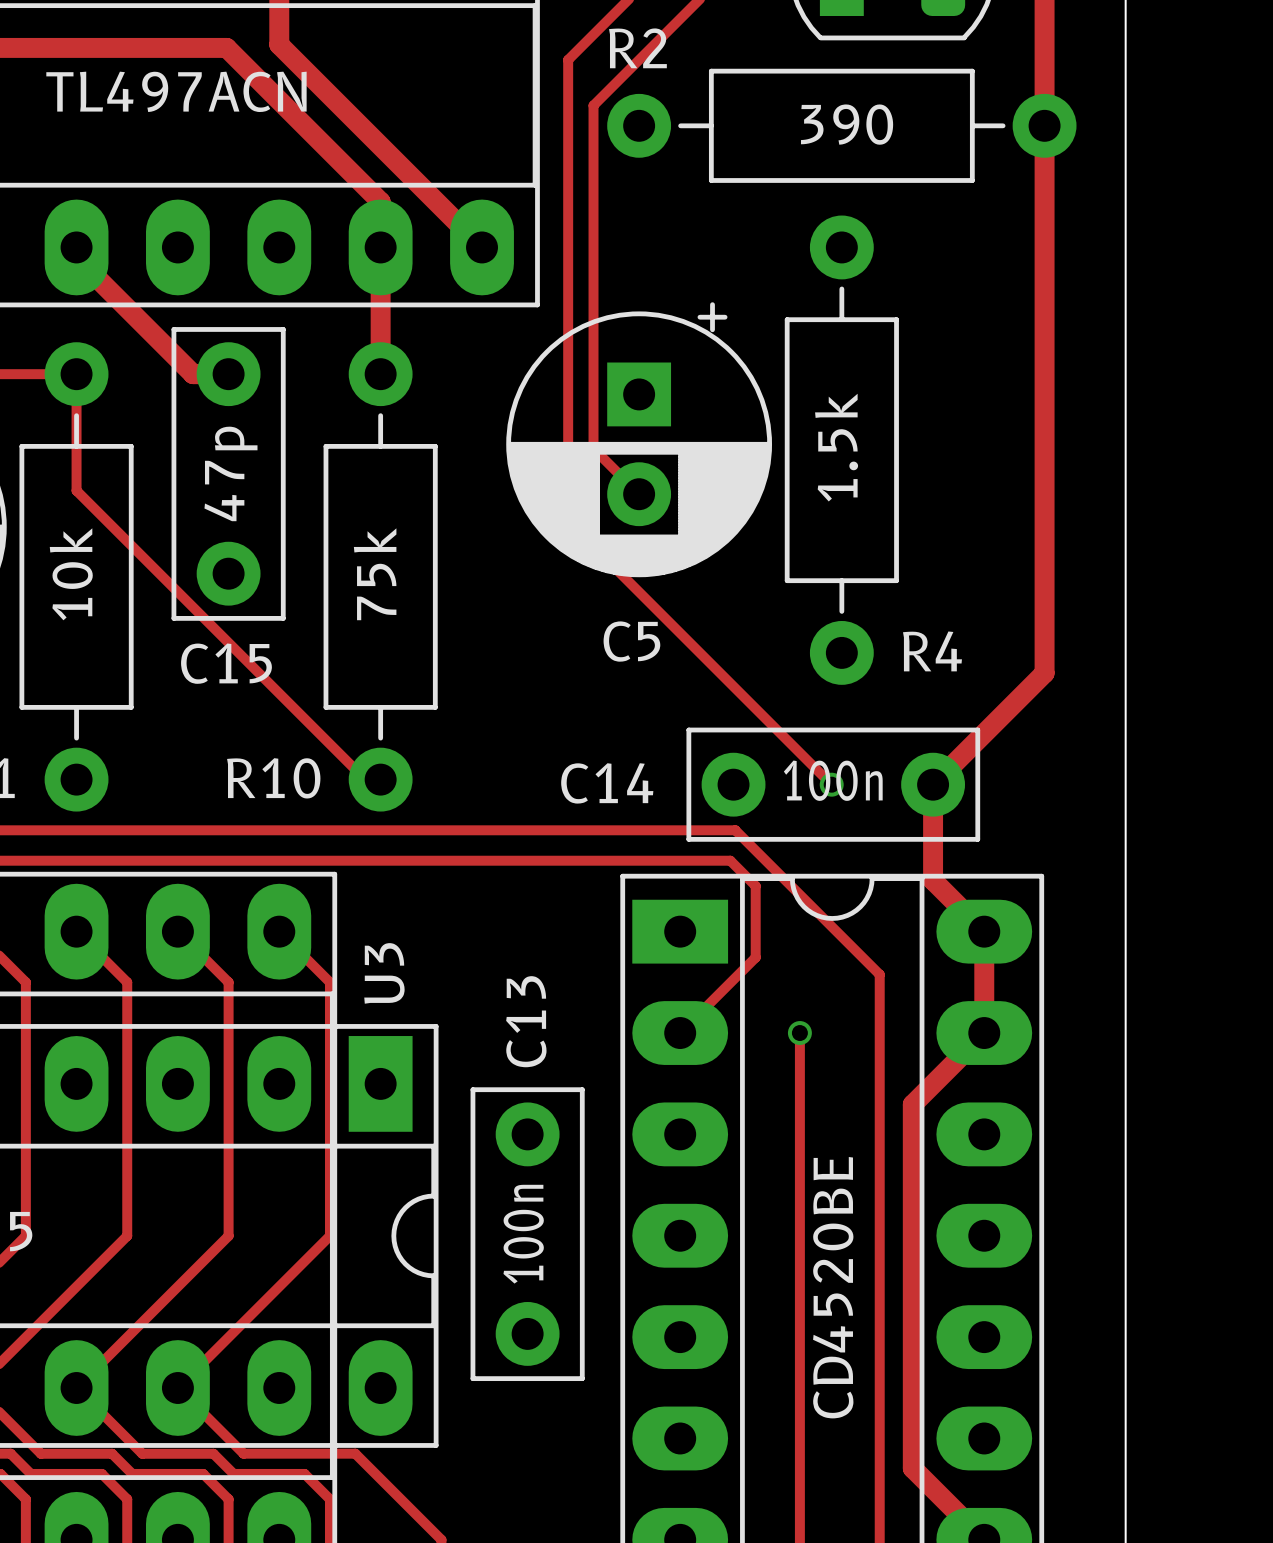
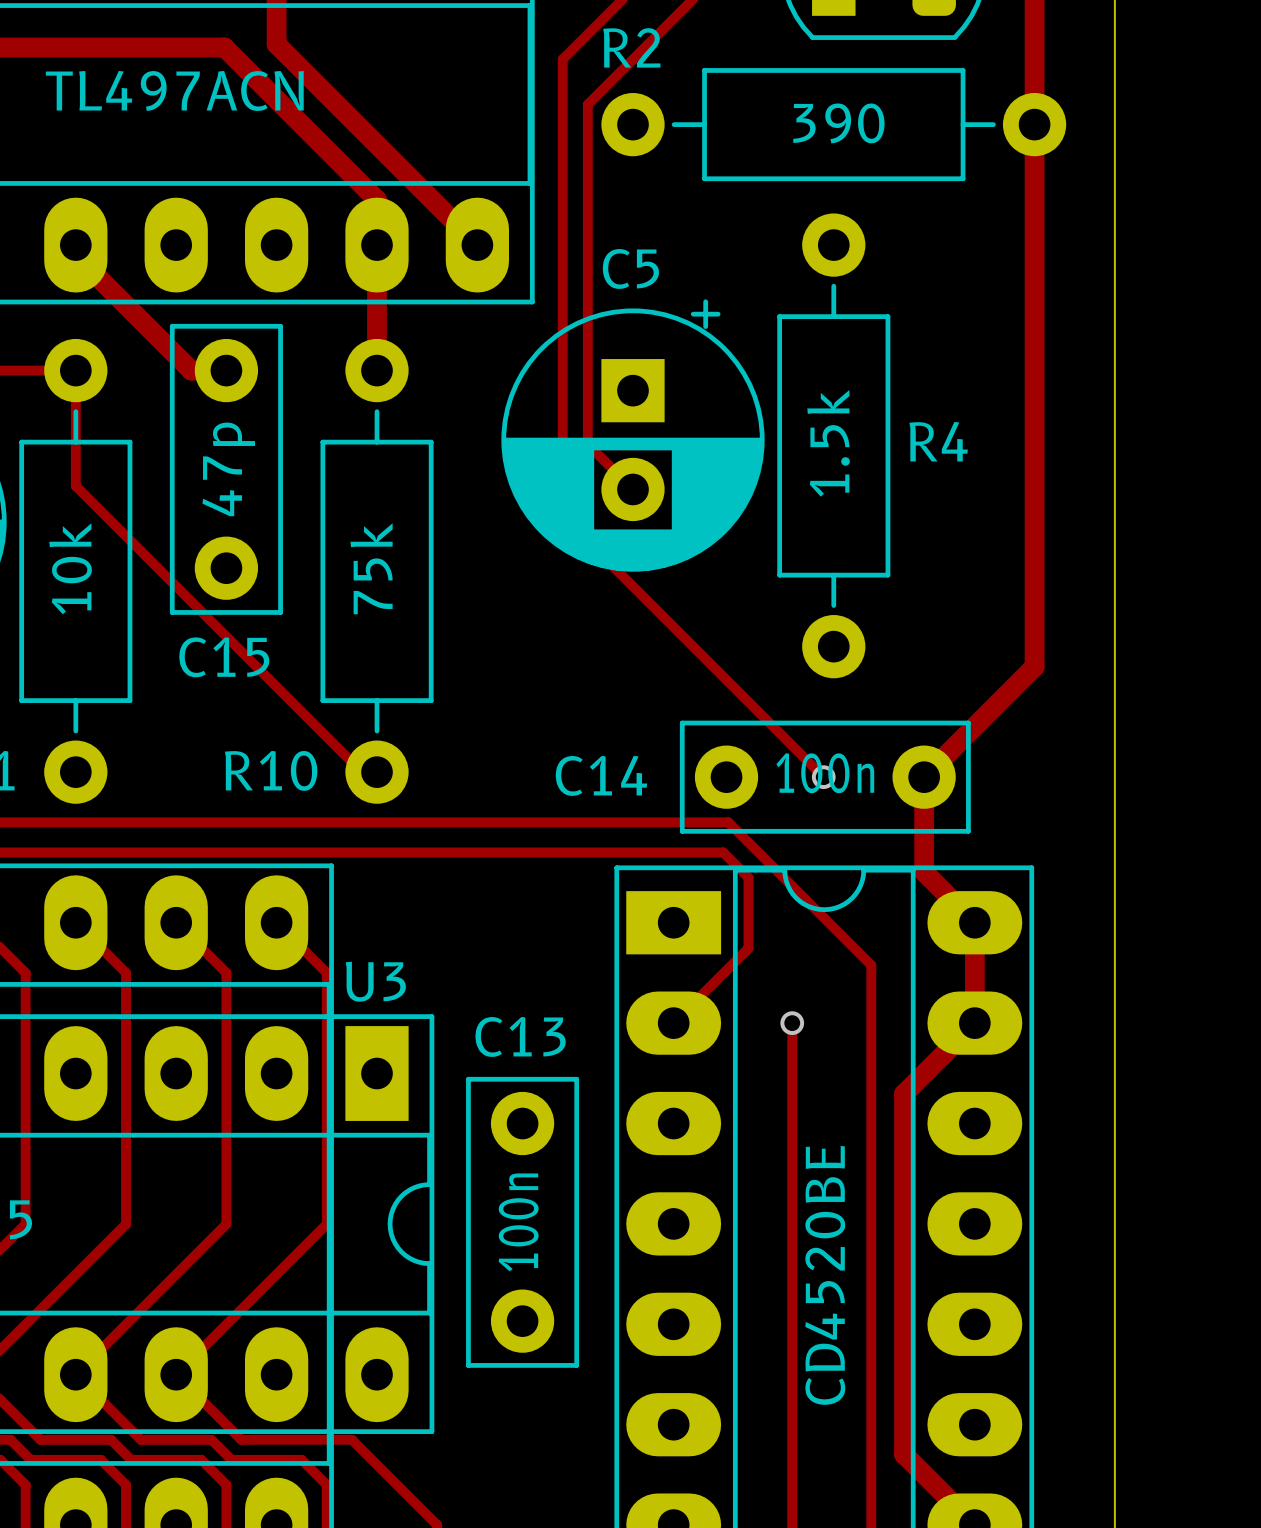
C5 name position: C5 (631, 641) -> C5 (630, 268)
R4 name position: R4 (932, 651) -> R4 (938, 441)
U3 name rotation: 0° (384, 973) -> 90° clockwise (375, 981)
C13 name rotation: 0° (526, 1021) -> 90° clockwise (520, 1036)

